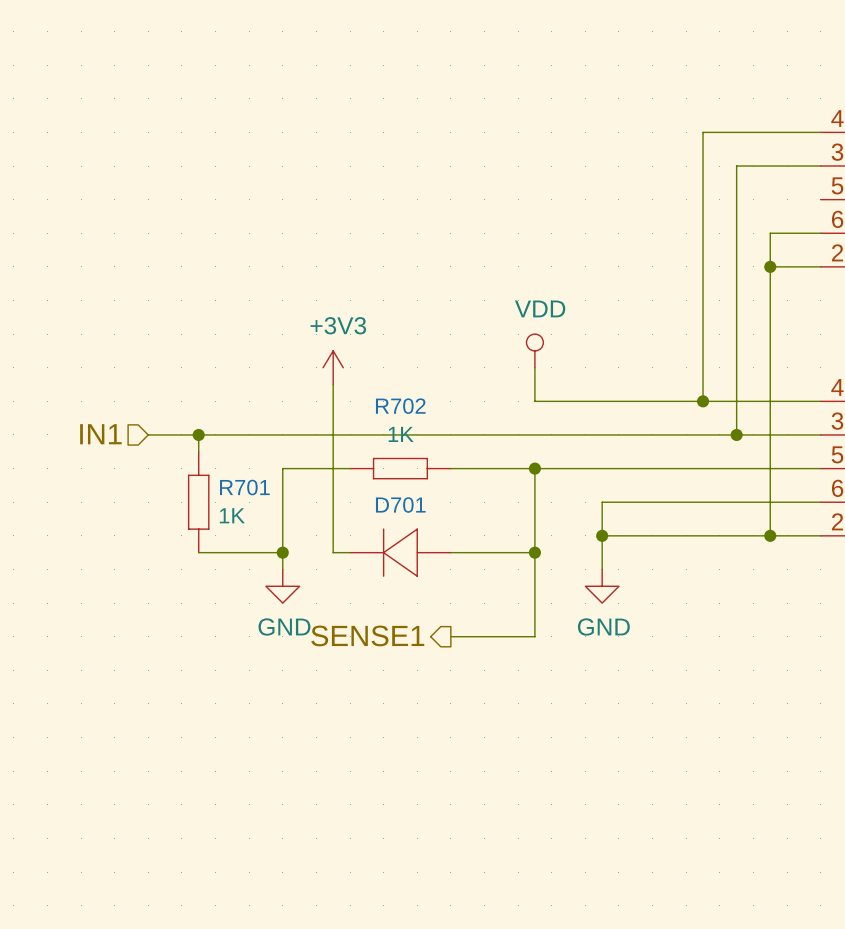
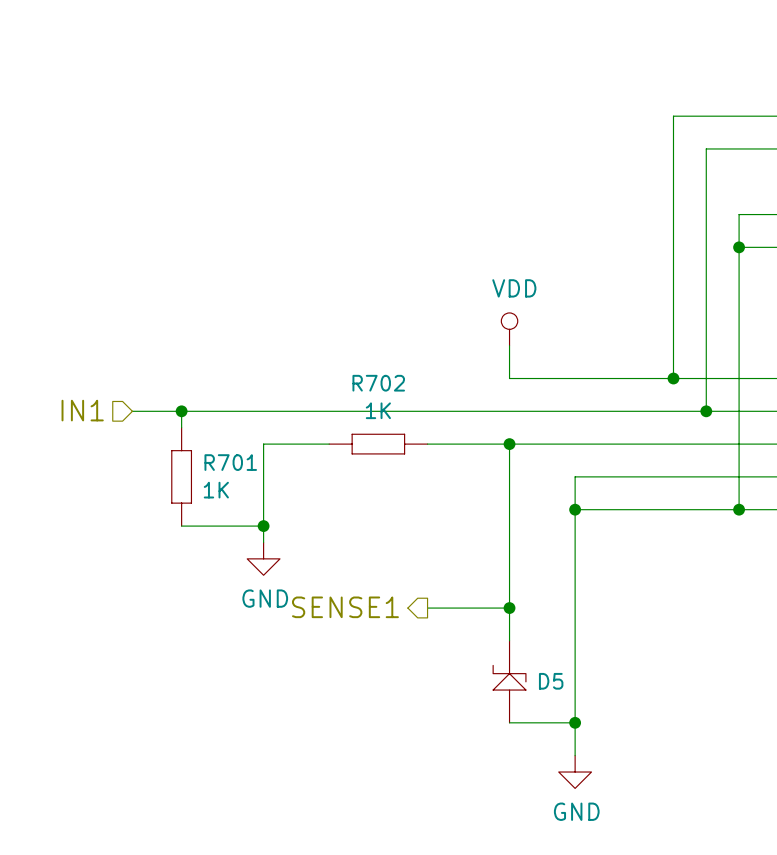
power symbol: +3V3 (333, 367) -> none
wire: (333, 384) (333, 552) (350, 552) -> none
D701: (400, 552) -> none
wire: (450, 552) (534, 552) -> none
junction: (534, 552) -> none
wire: none -> (575, 542) (575, 755)
power symbol position: GND (602, 586) -> GND (575, 772)
wire: none -> (509, 608) (509, 640)
junction: none -> (509, 608)
D5: none -> (509, 681)
wire: none -> (509, 722) (575, 722)
junction: none -> (575, 722)

